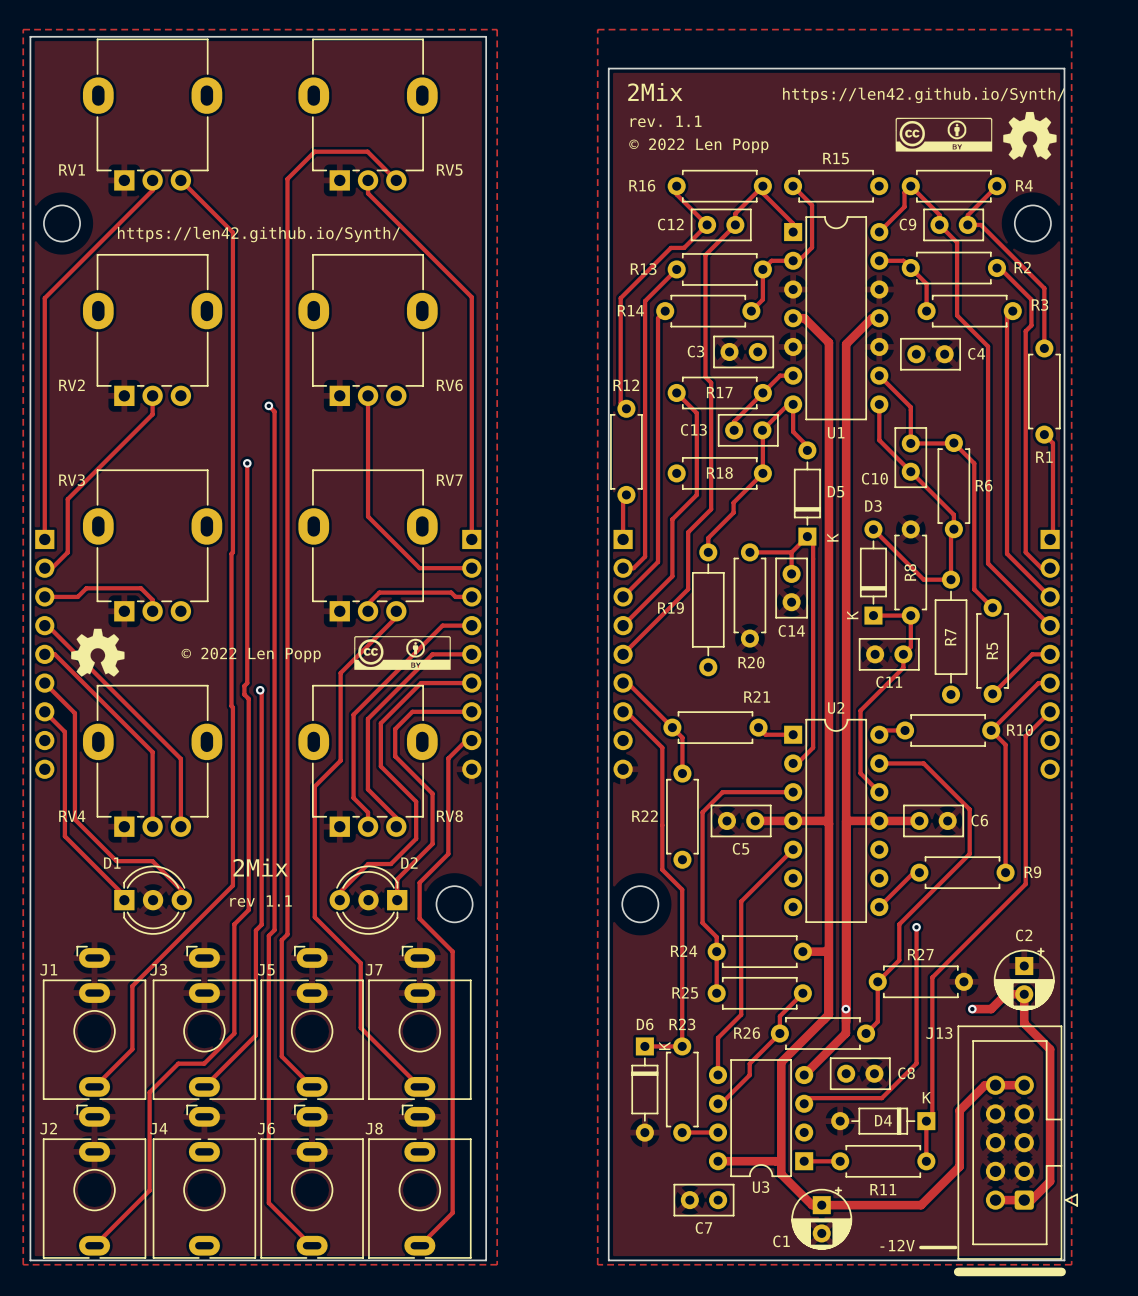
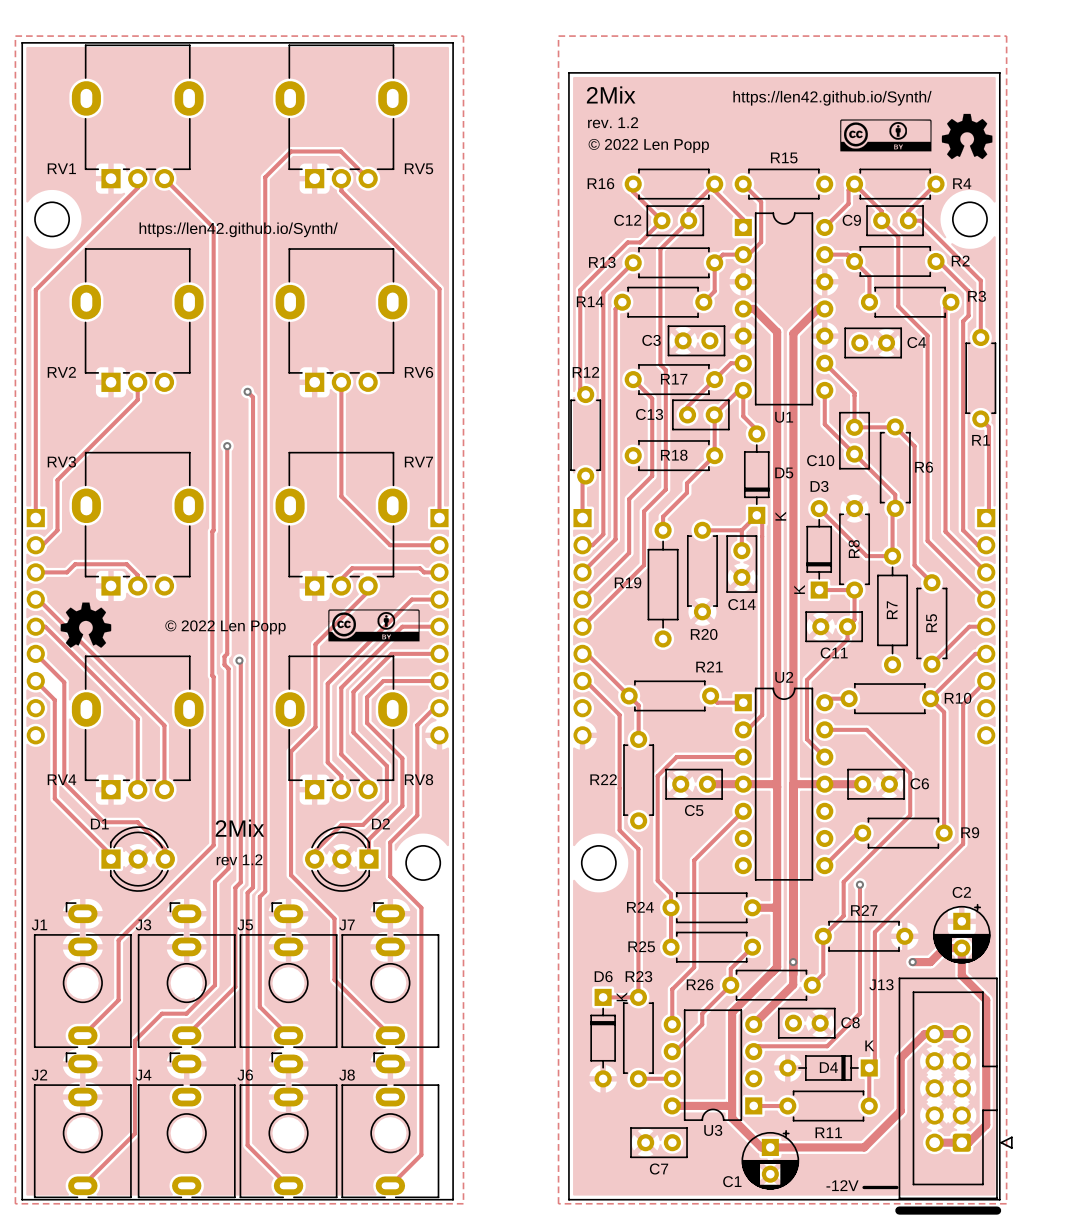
text: rev. 1.1 (666, 121) -> rev. 1.2 (613, 122)
text: rev 1.1 (261, 901) -> rev 1.2 (239, 859)

